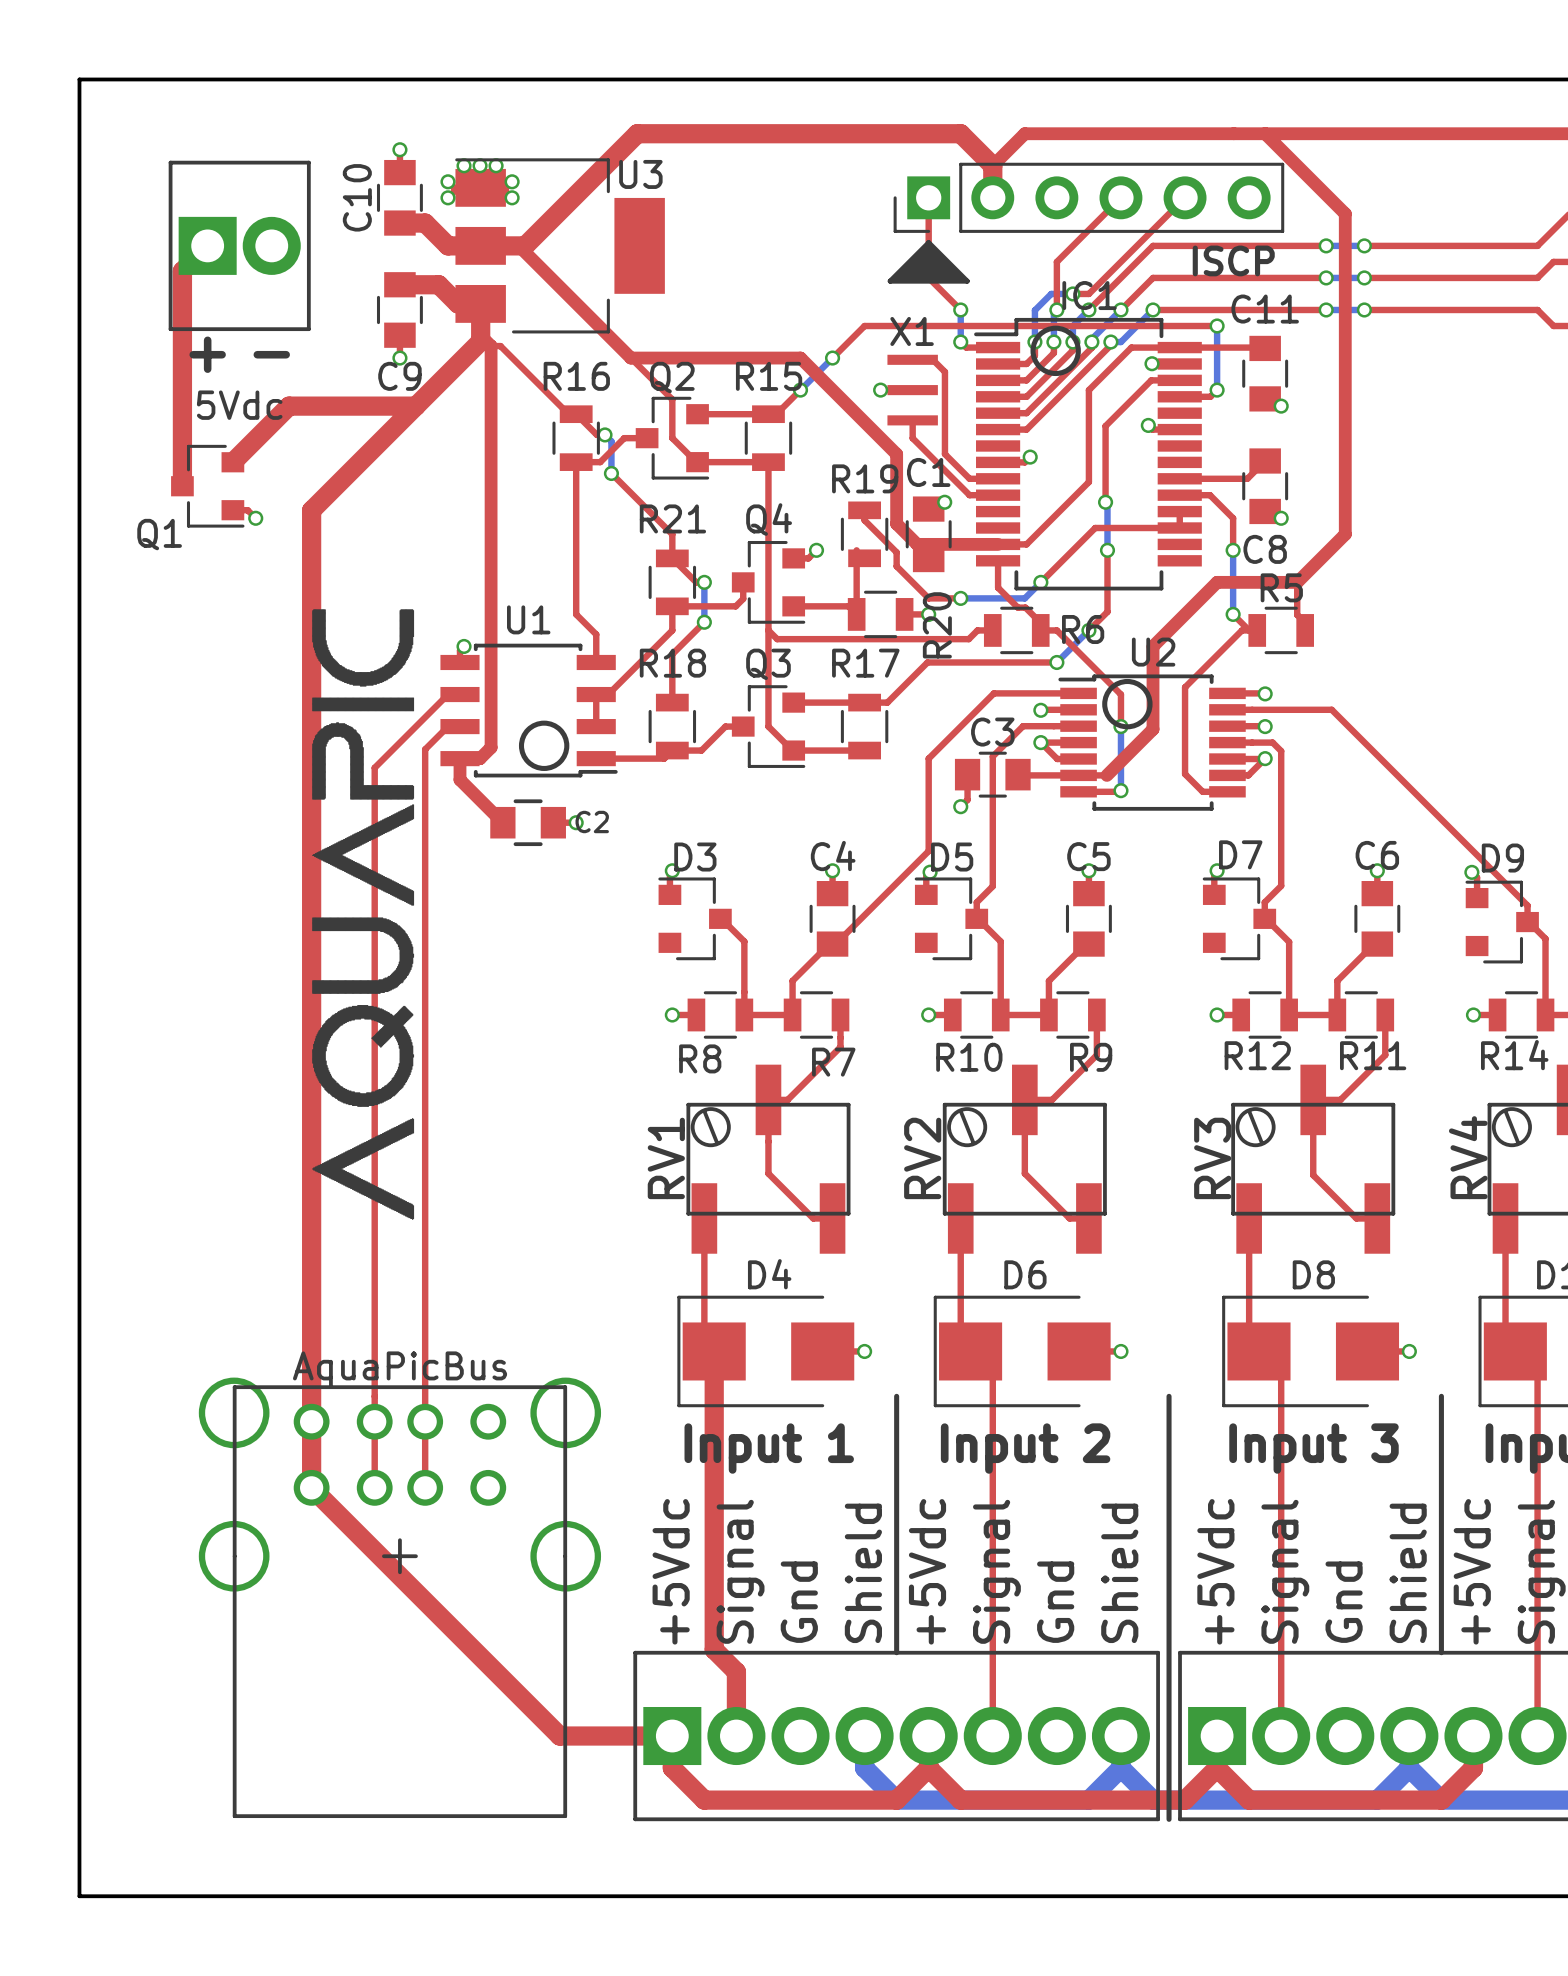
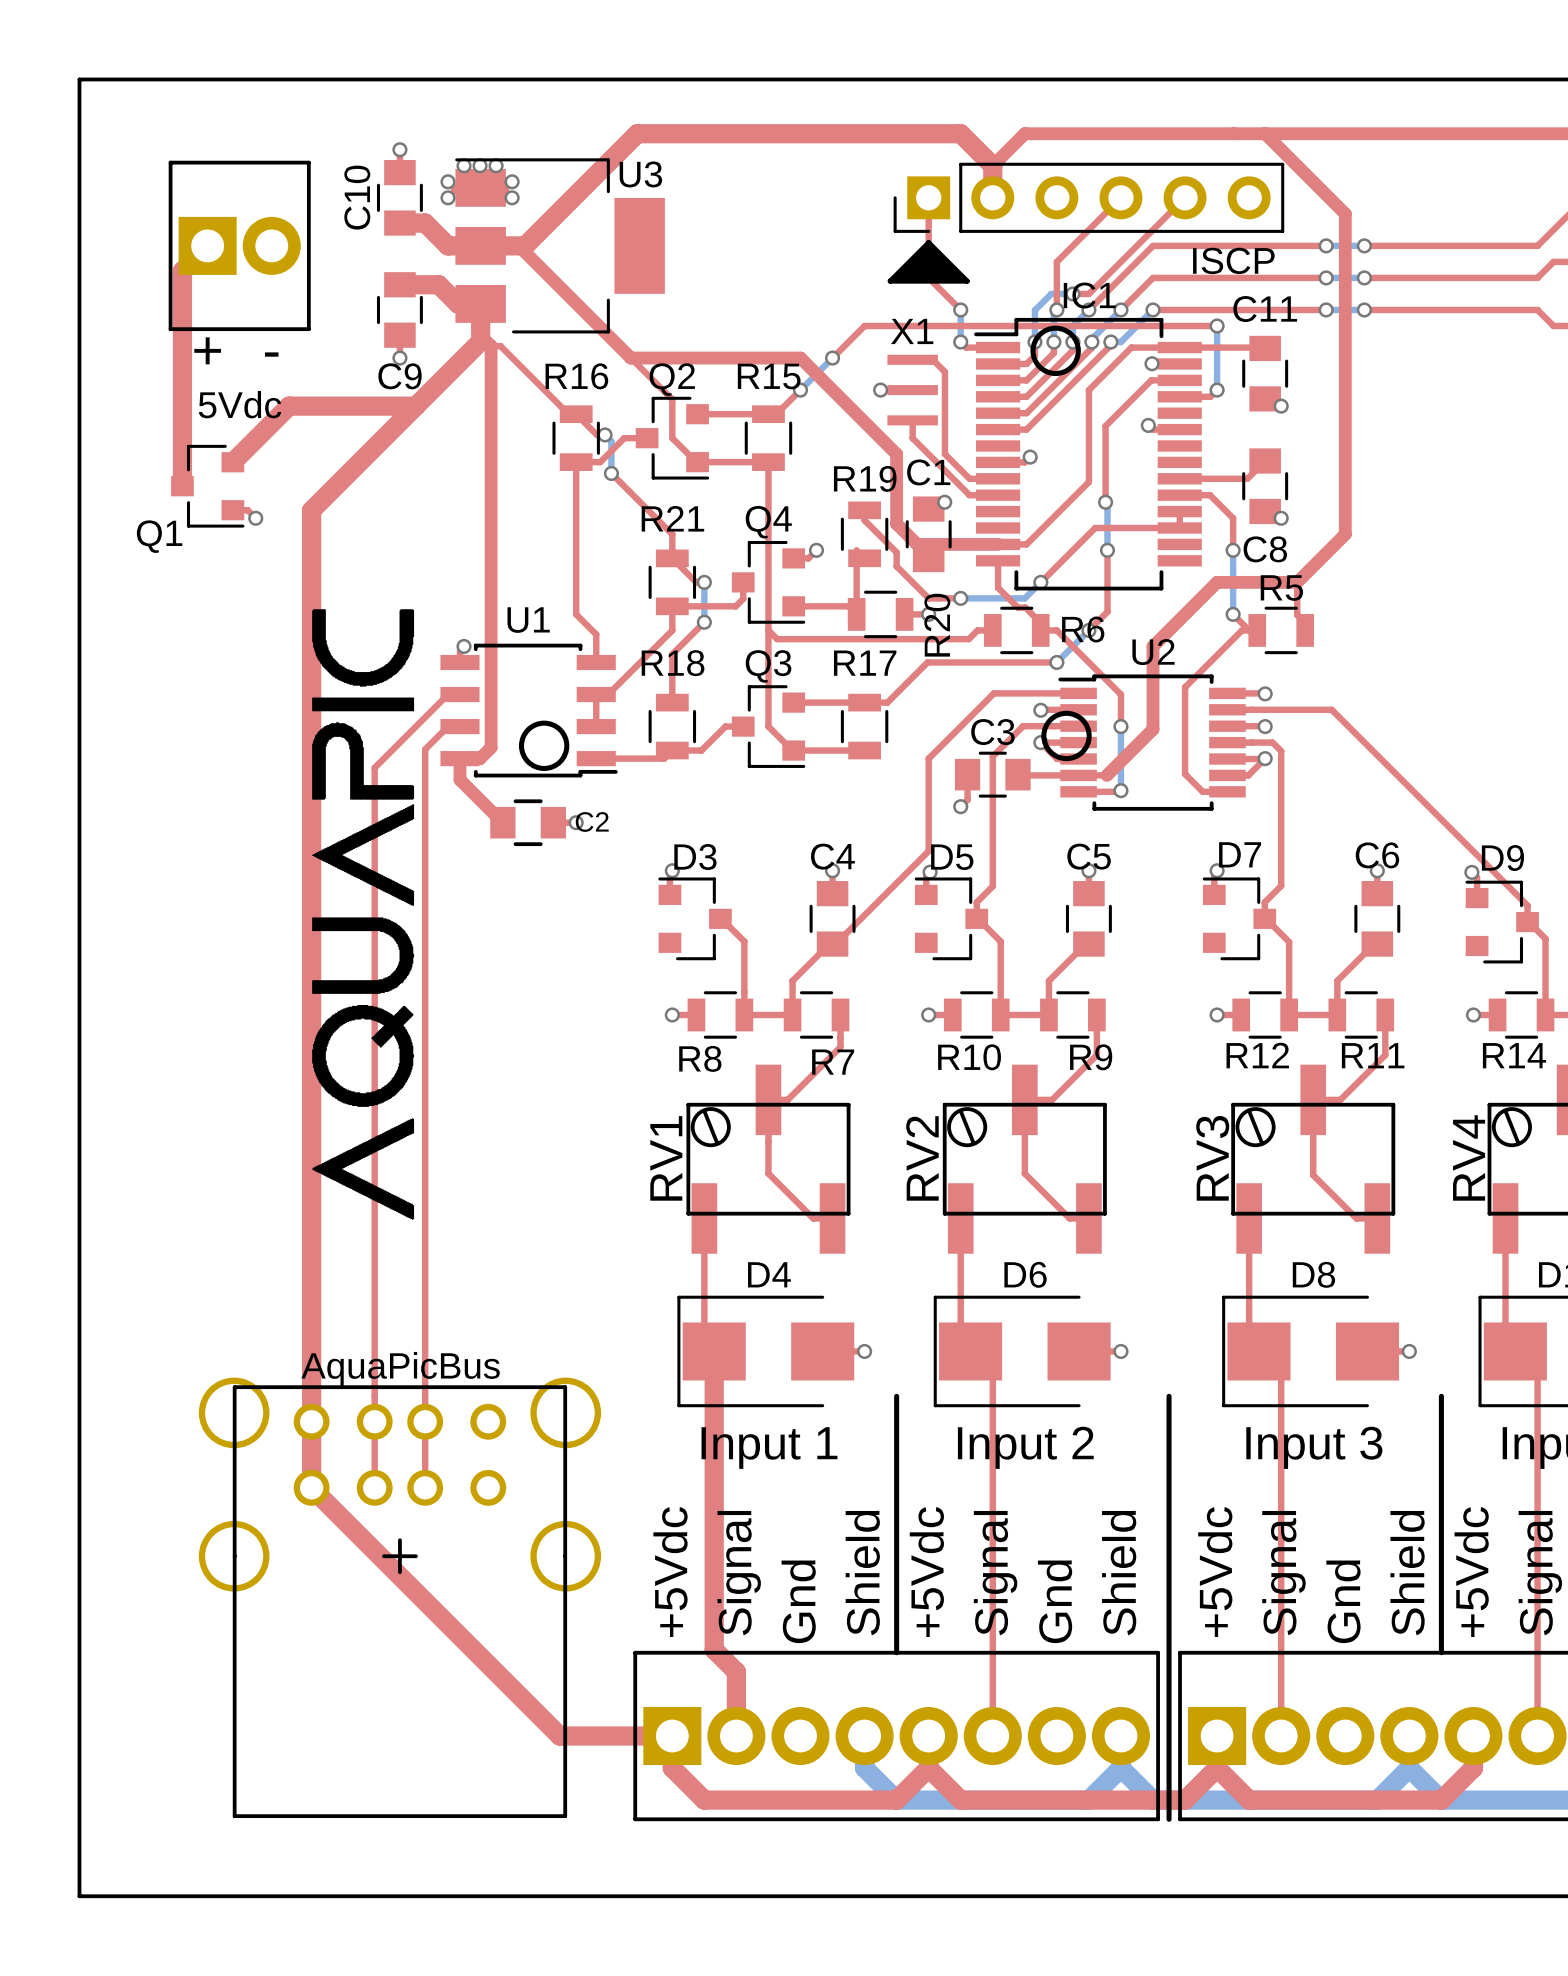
drawing position: (1127, 704) -> (1066, 735)

